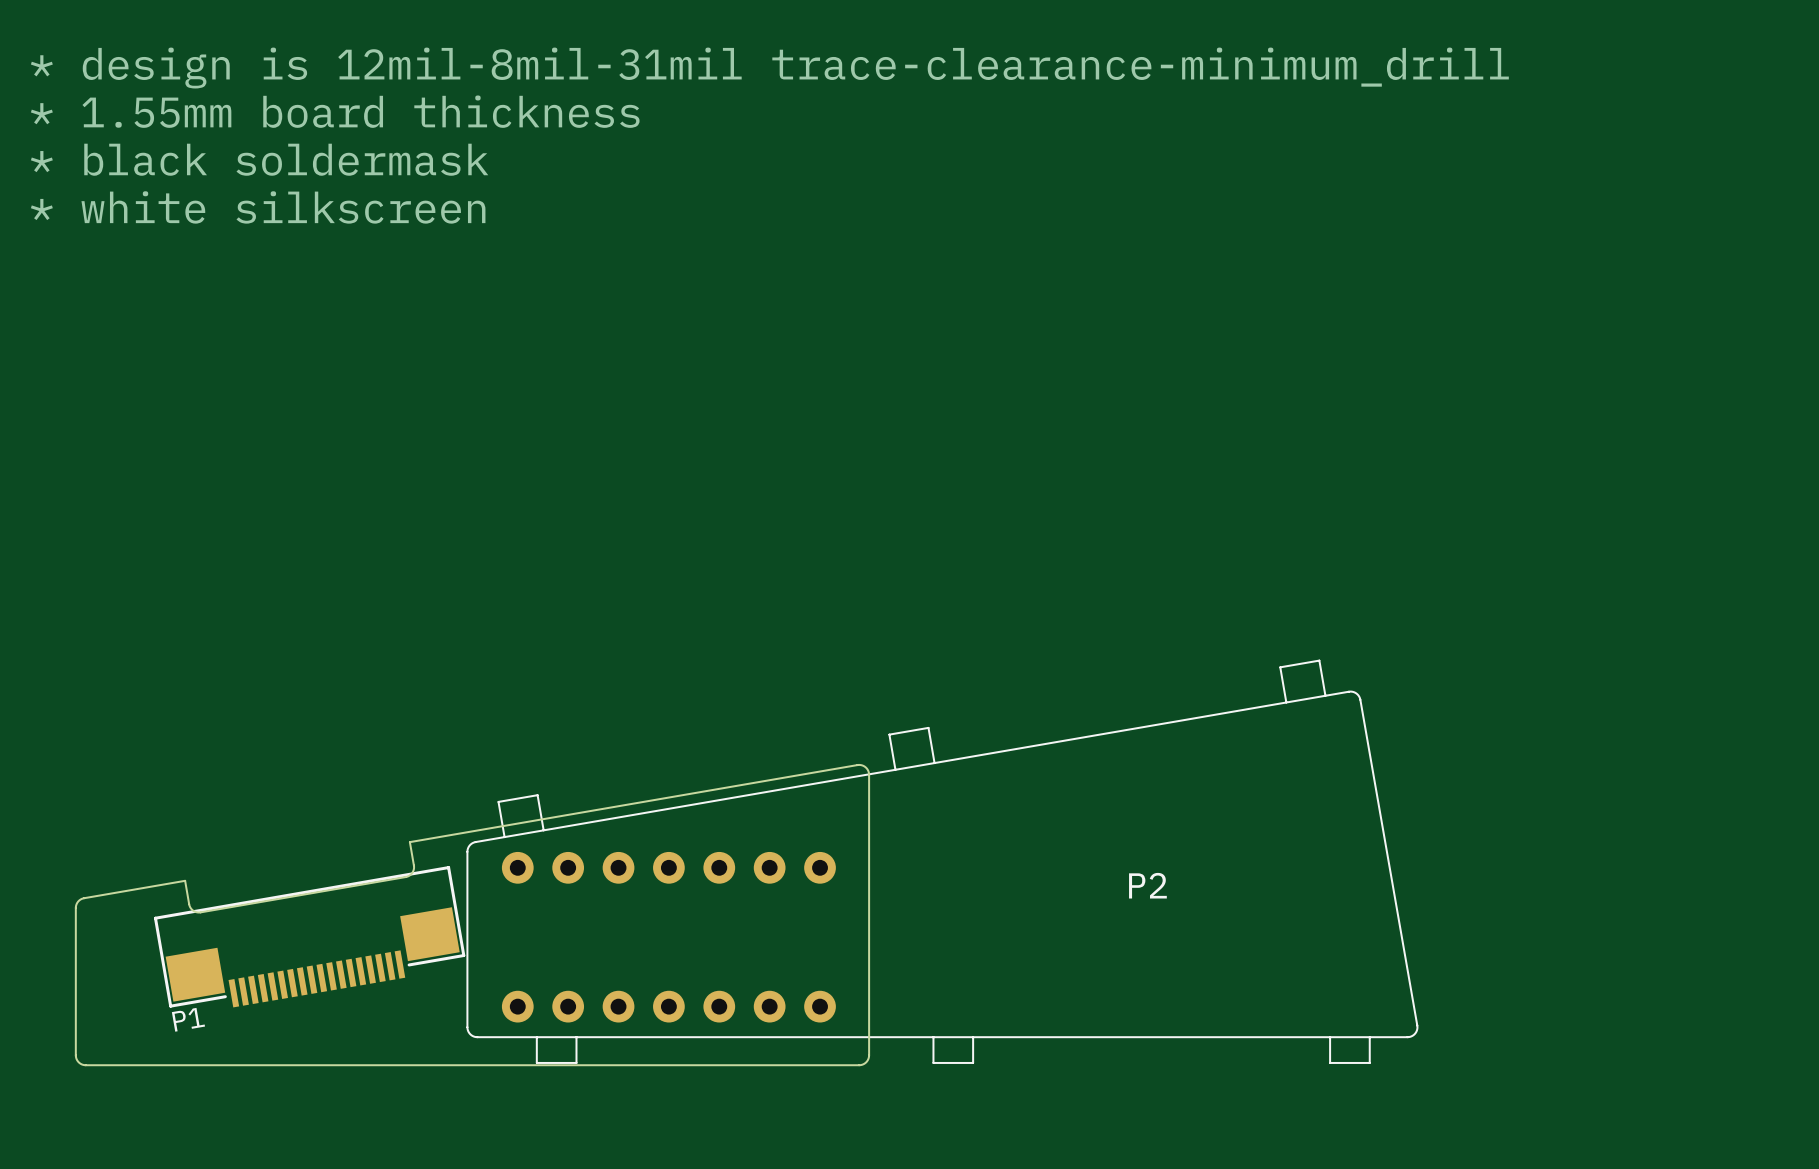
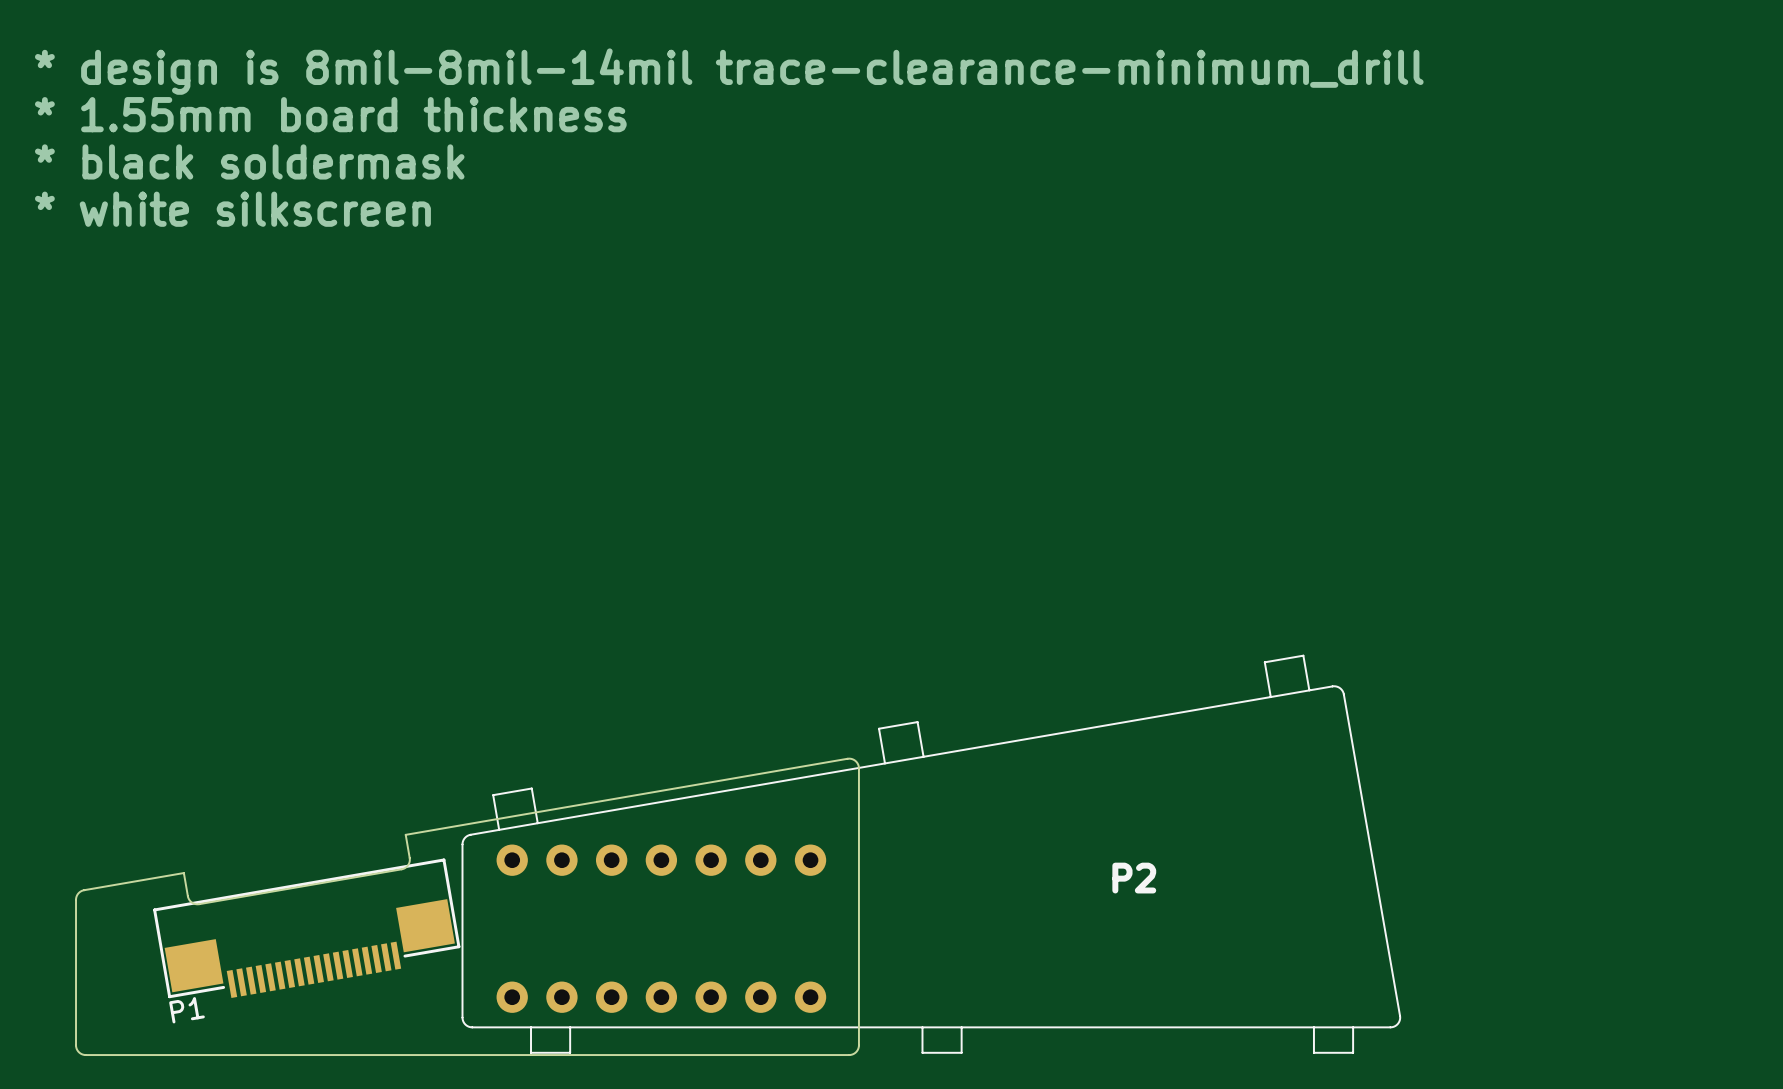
text: * design is 12mil-8mil-31mil trace-clearance-minimum_drill (769, 68) -> * design is 8mil-8mil-14mil trace-clearance-minimum_drill (729, 71)

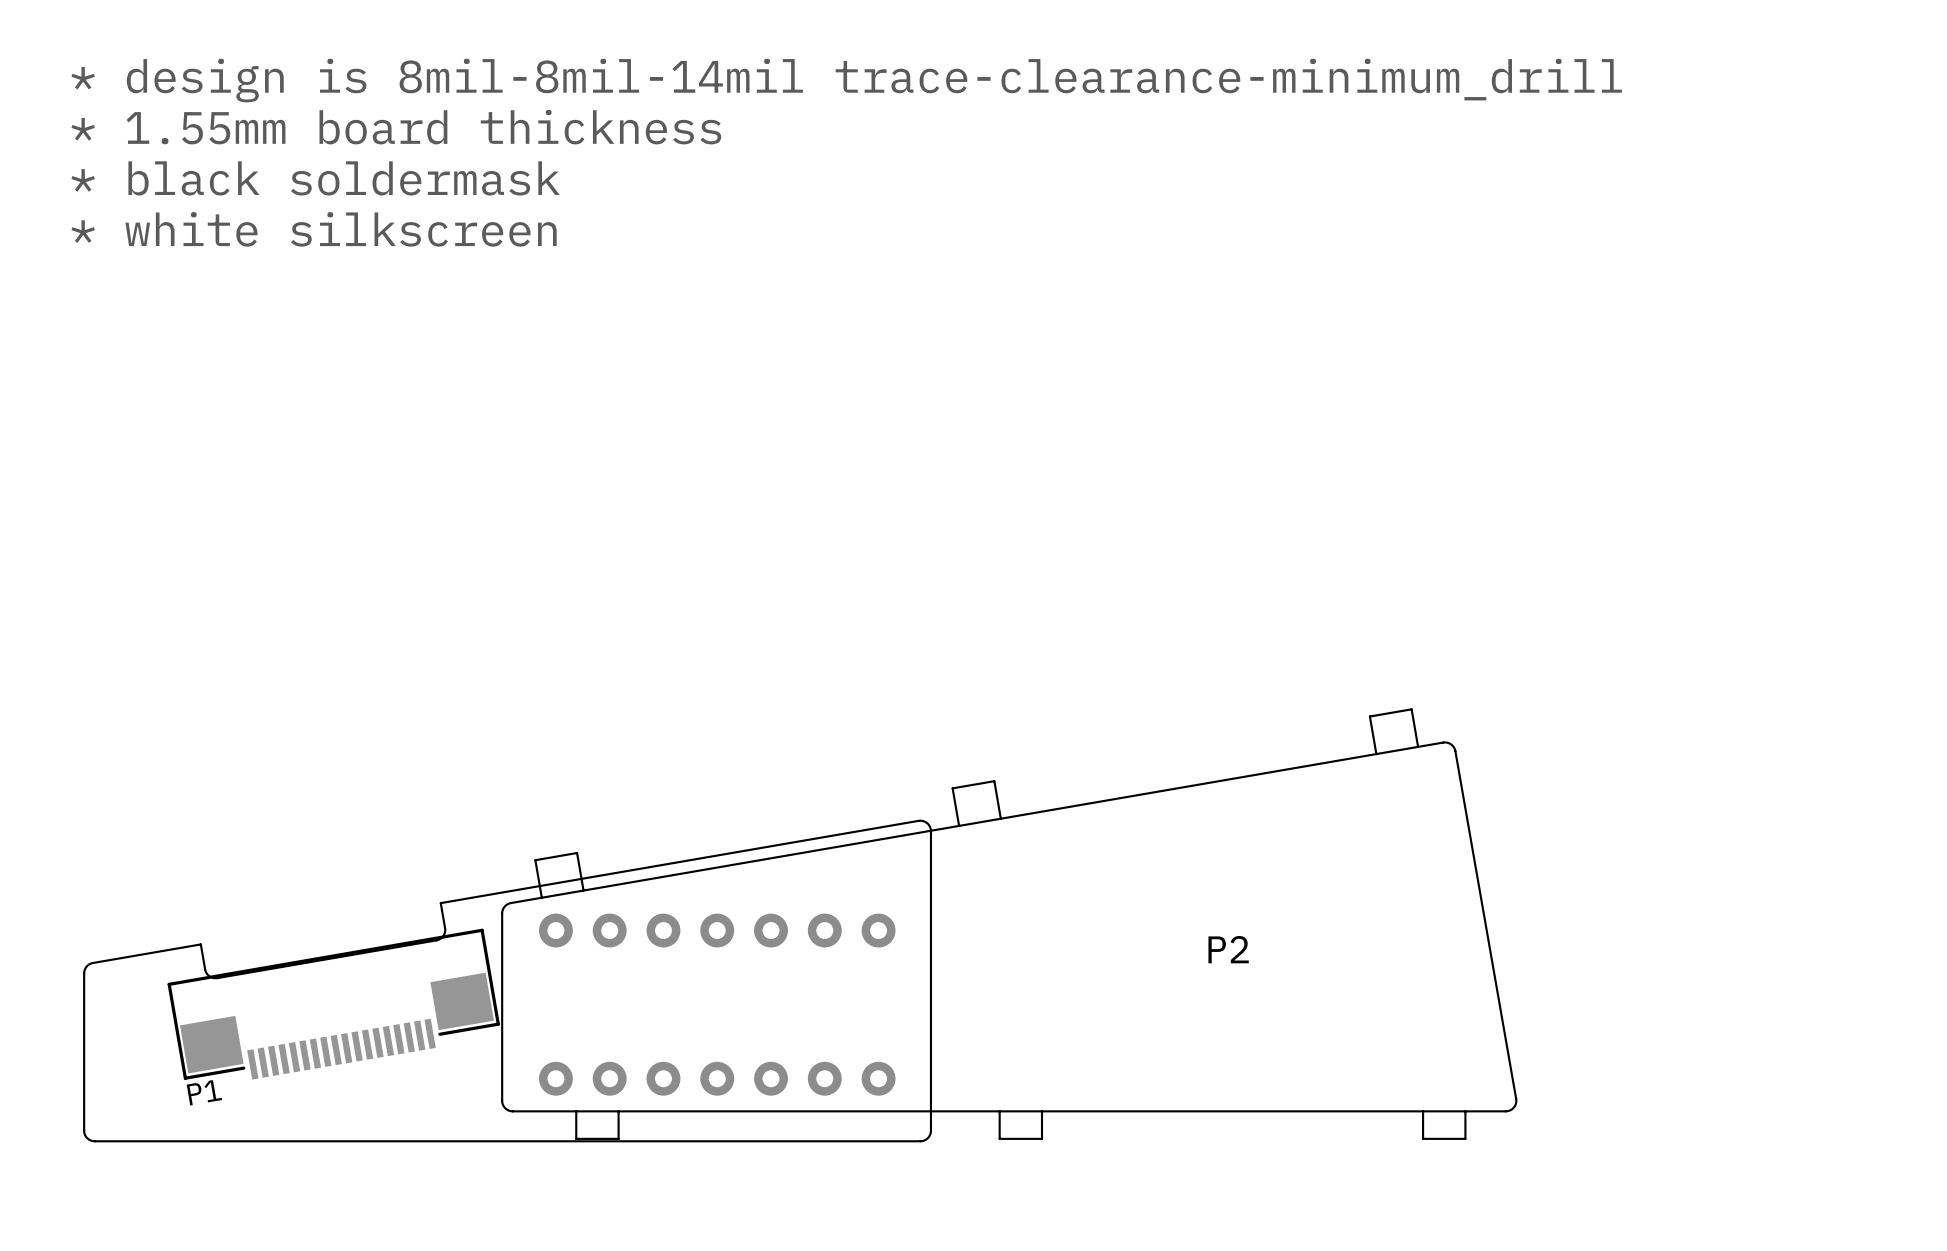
text position: * design is 8mil-8mil-14mil trace-clearance-minimum_drill (729, 71) -> * design is 8mil-8mil-14mil trace-clearance-minimum_drill (846, 80)
text position: * 1.55mm board thickness (330, 114) -> * 1.55mm board thickness (396, 127)
text position: * black soldermask (249, 161) -> * black soldermask (315, 178)
text position: * white silkscreen (232, 209) -> * white silkscreen (314, 229)

